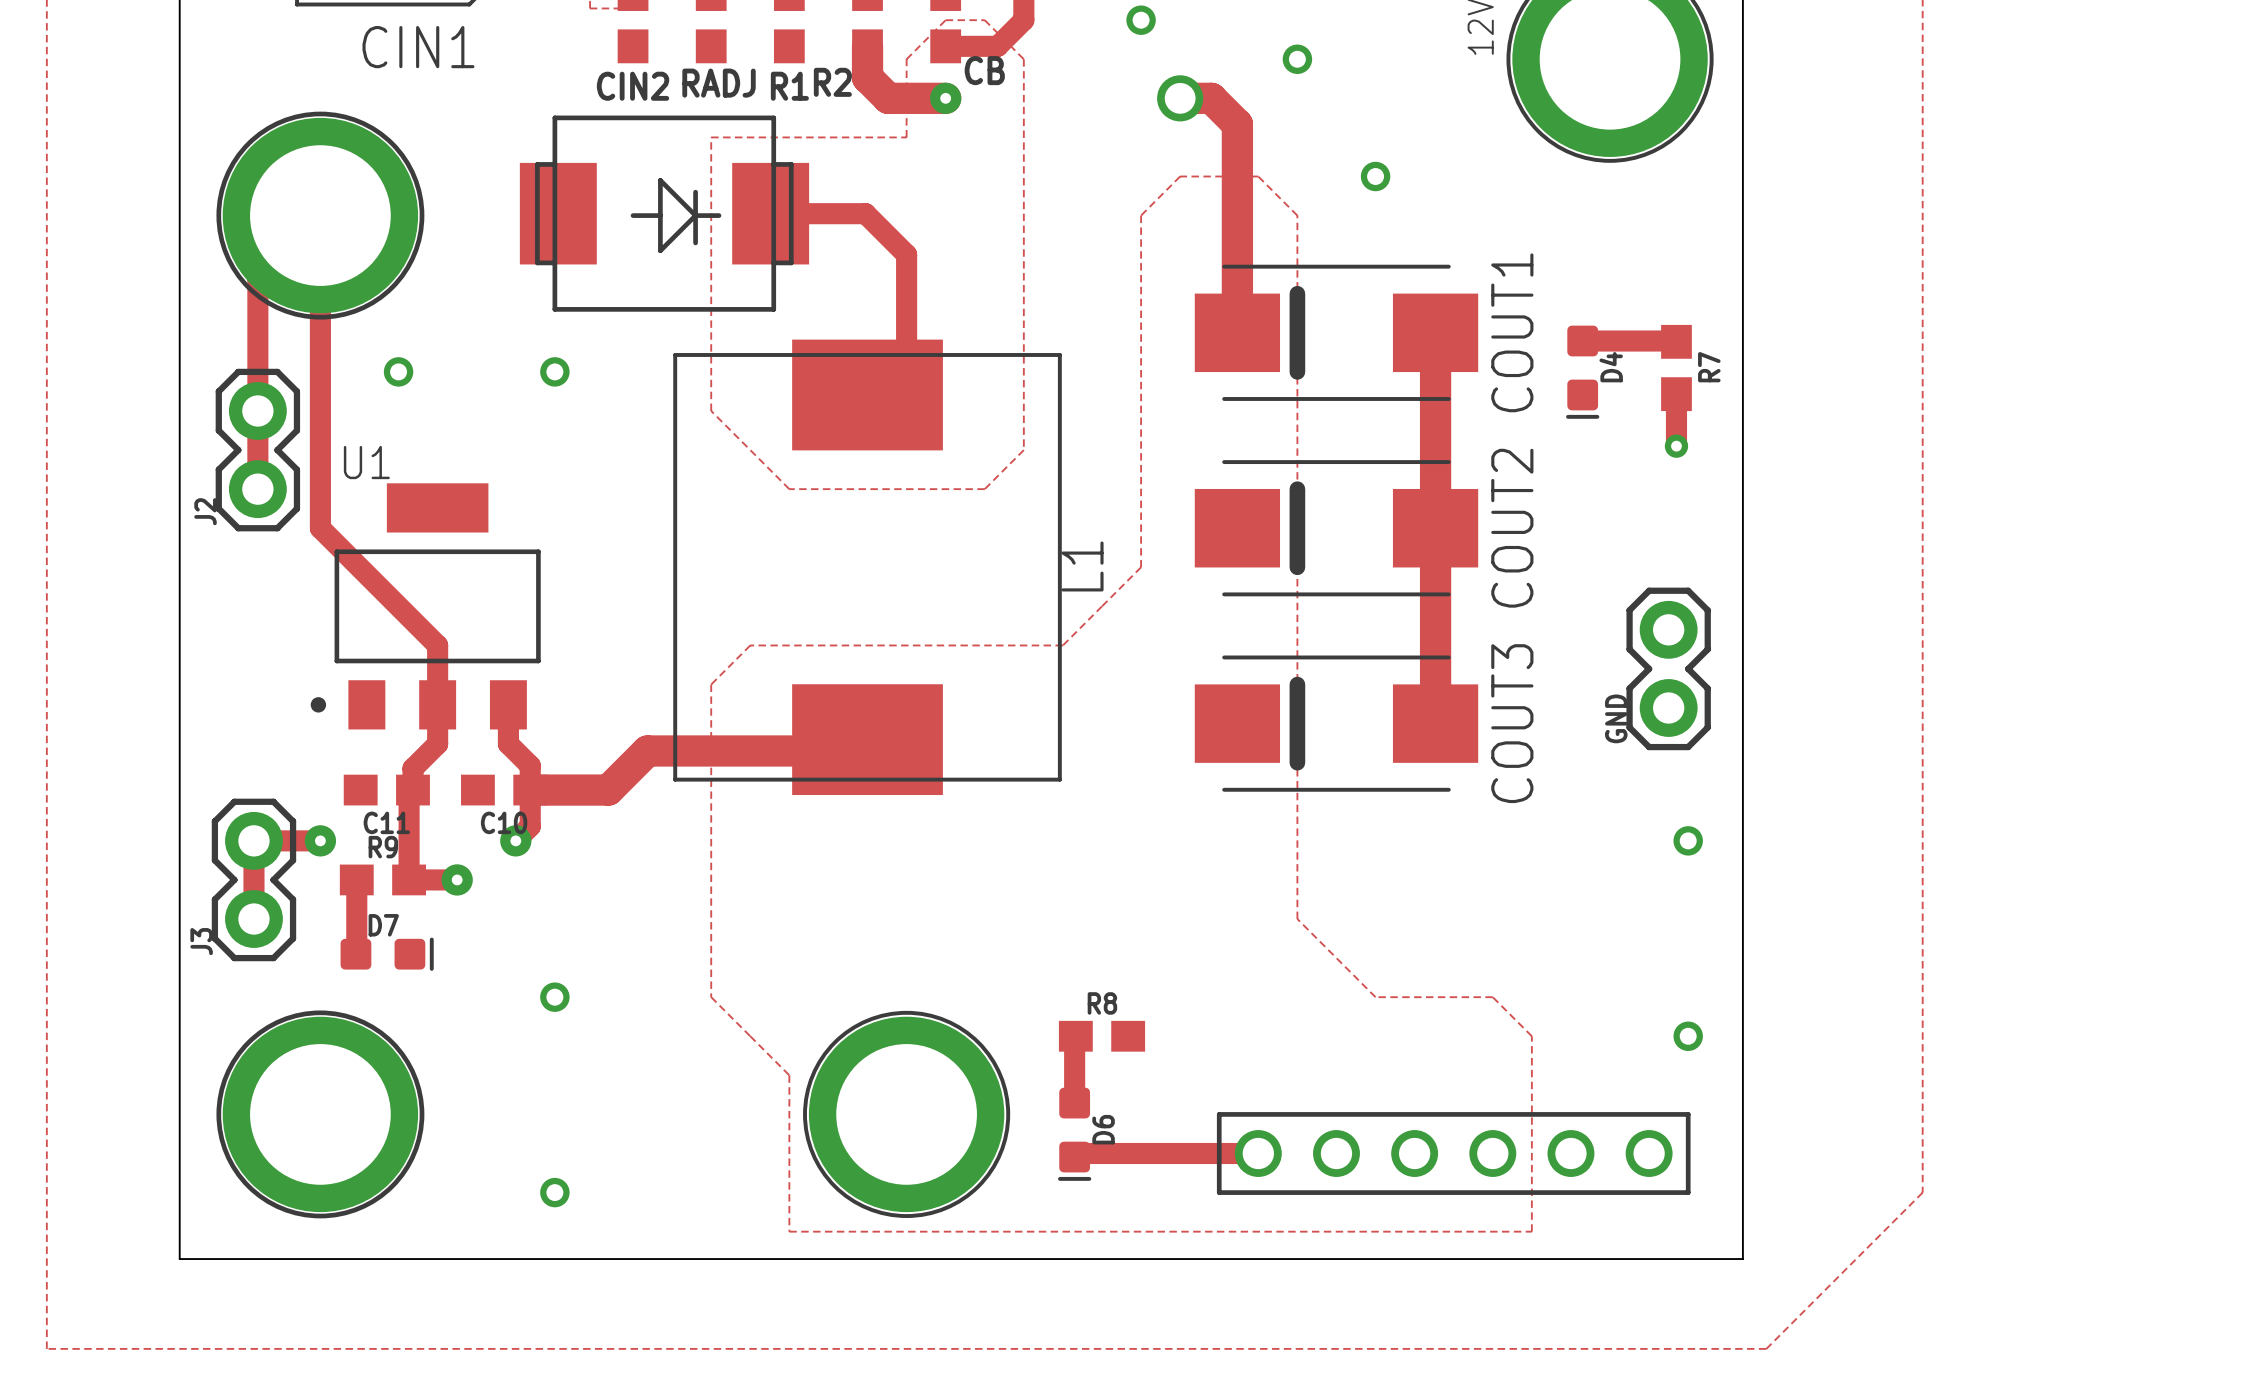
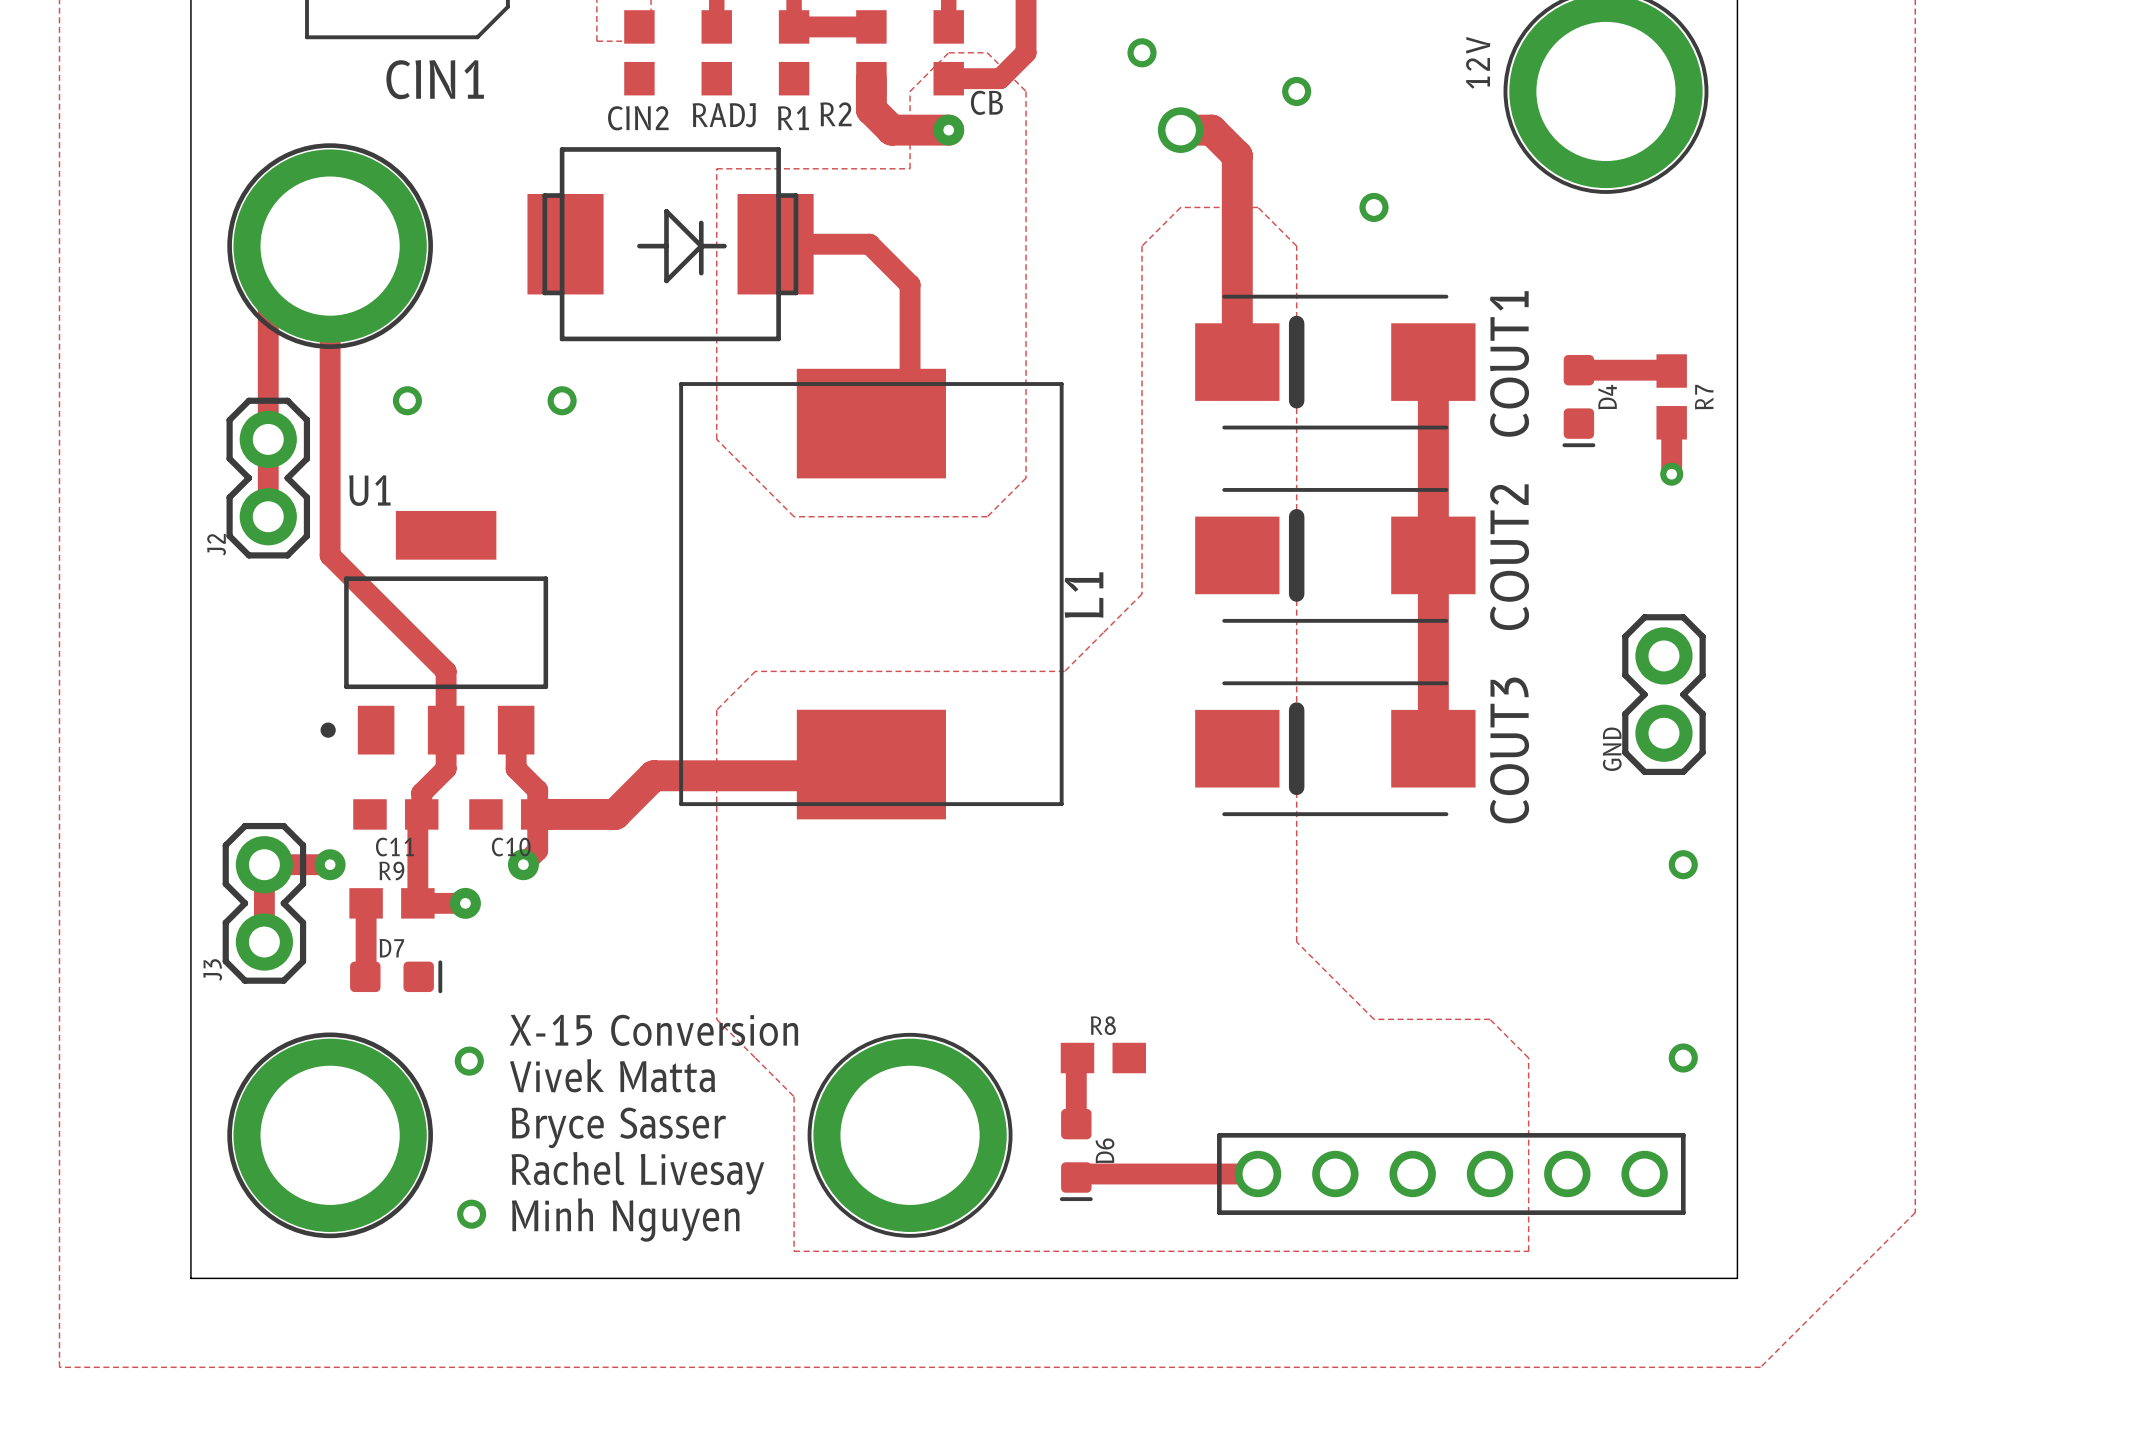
via: (554, 997) -> none
text: none -> X-15 Conversion (653, 1030)
via: none -> (469, 1061)
text: none -> Vivek Matta (612, 1075)
text: none -> Bryce Sasser (618, 1127)
text: none -> Rachel Livesay (637, 1173)
via: (554, 1192) -> none
via: none -> (471, 1214)
text: none -> Minh Nguyen (625, 1219)

